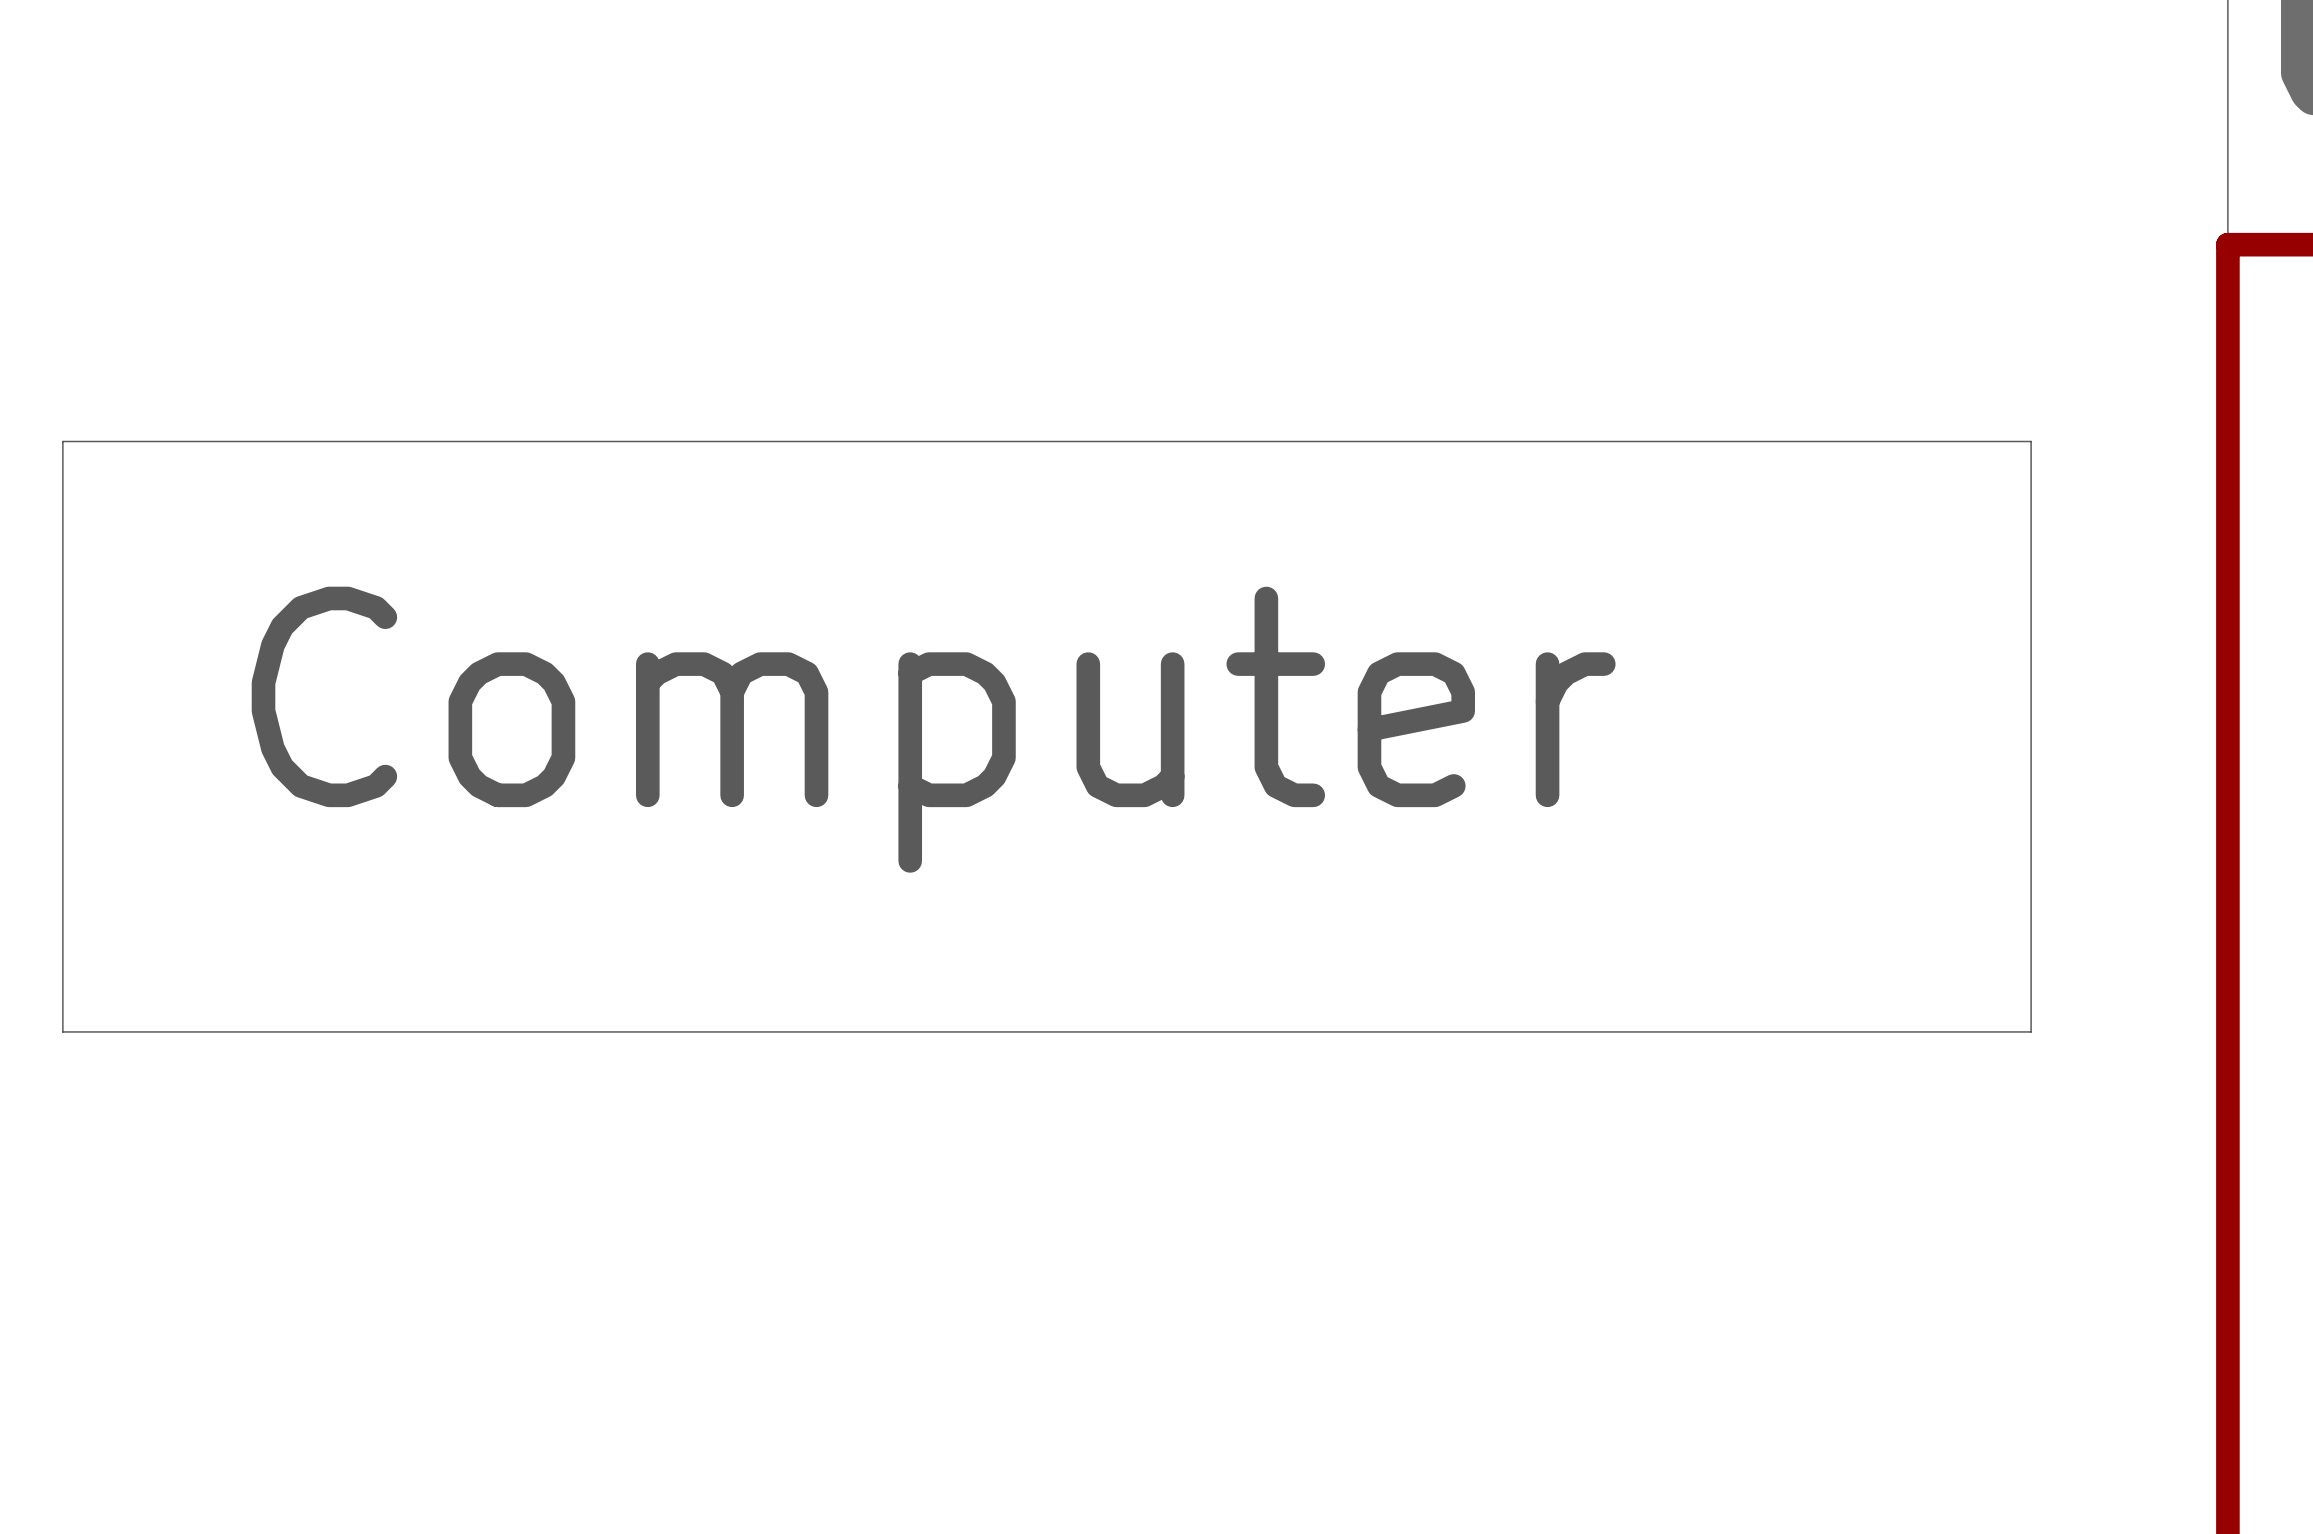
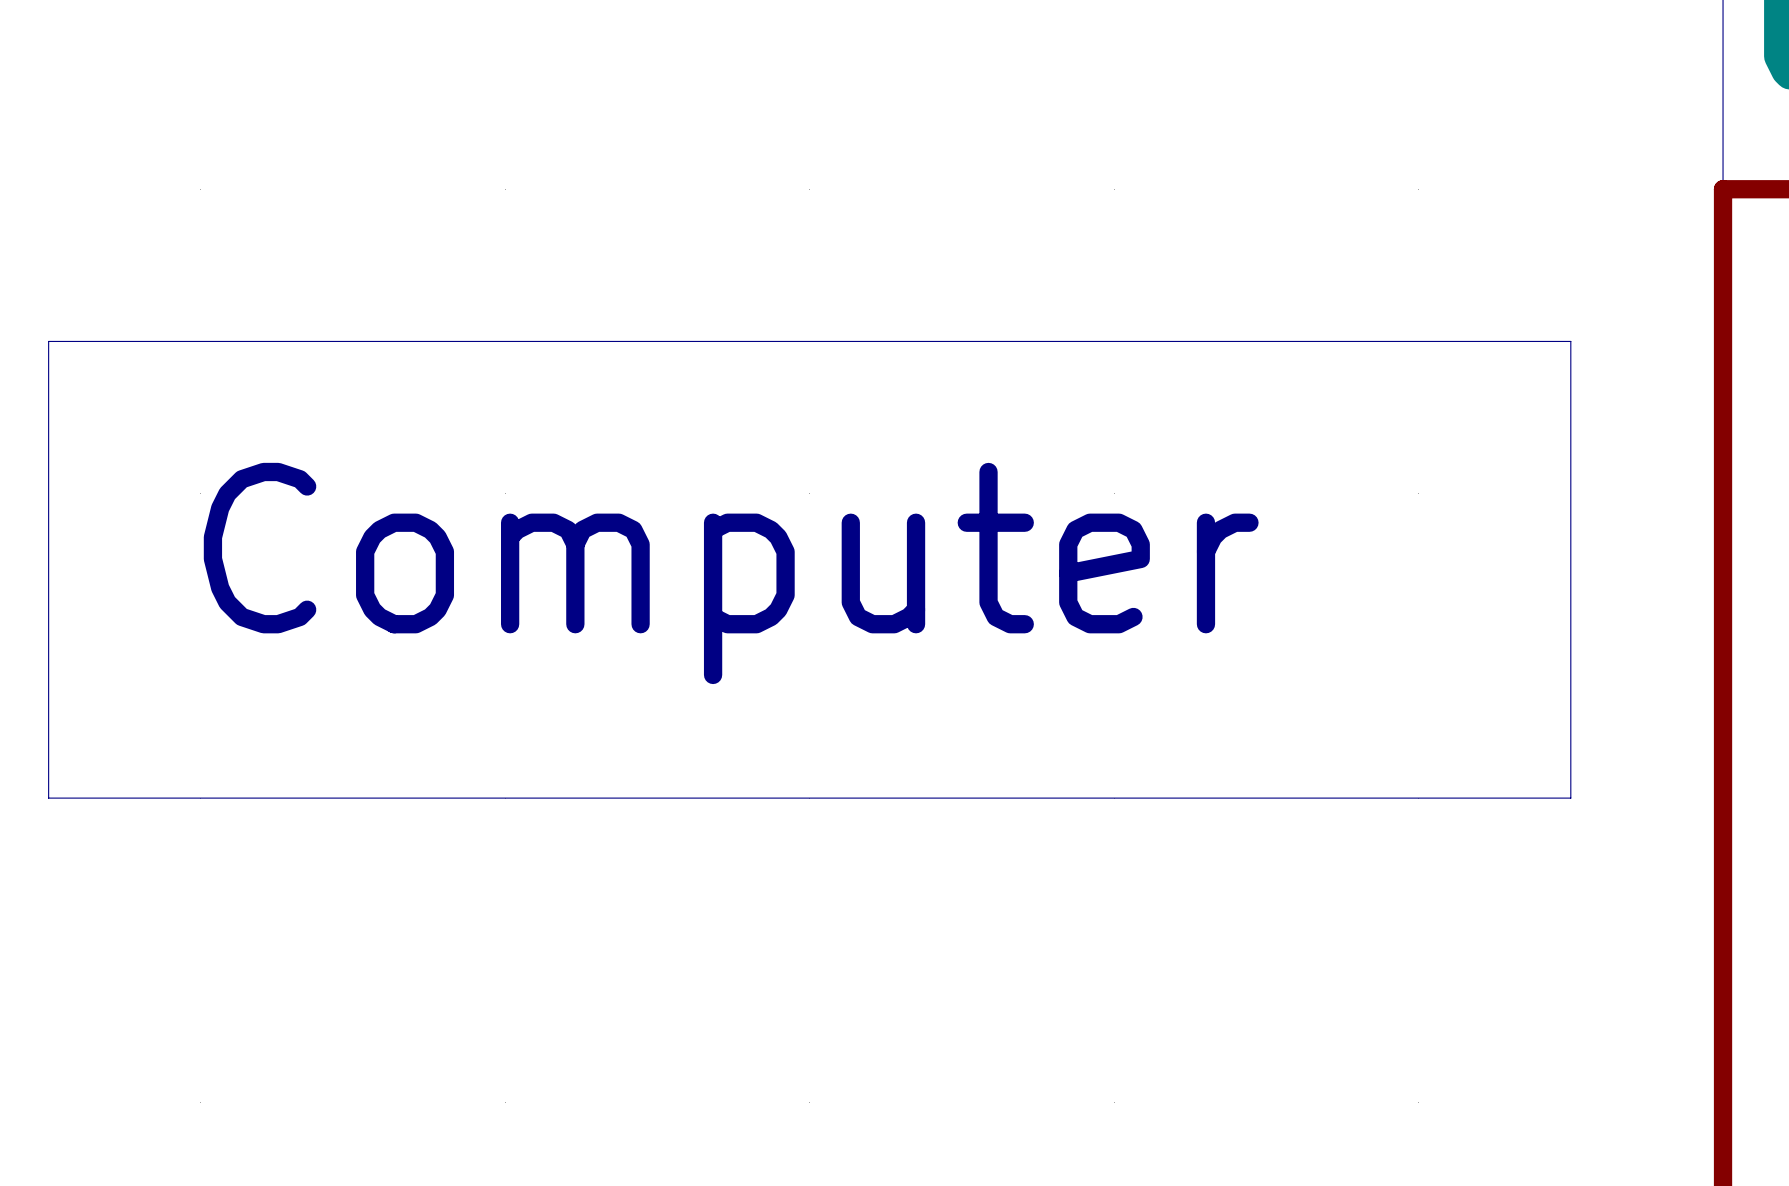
text position: Computer (933, 729) -> Computer (731, 573)

